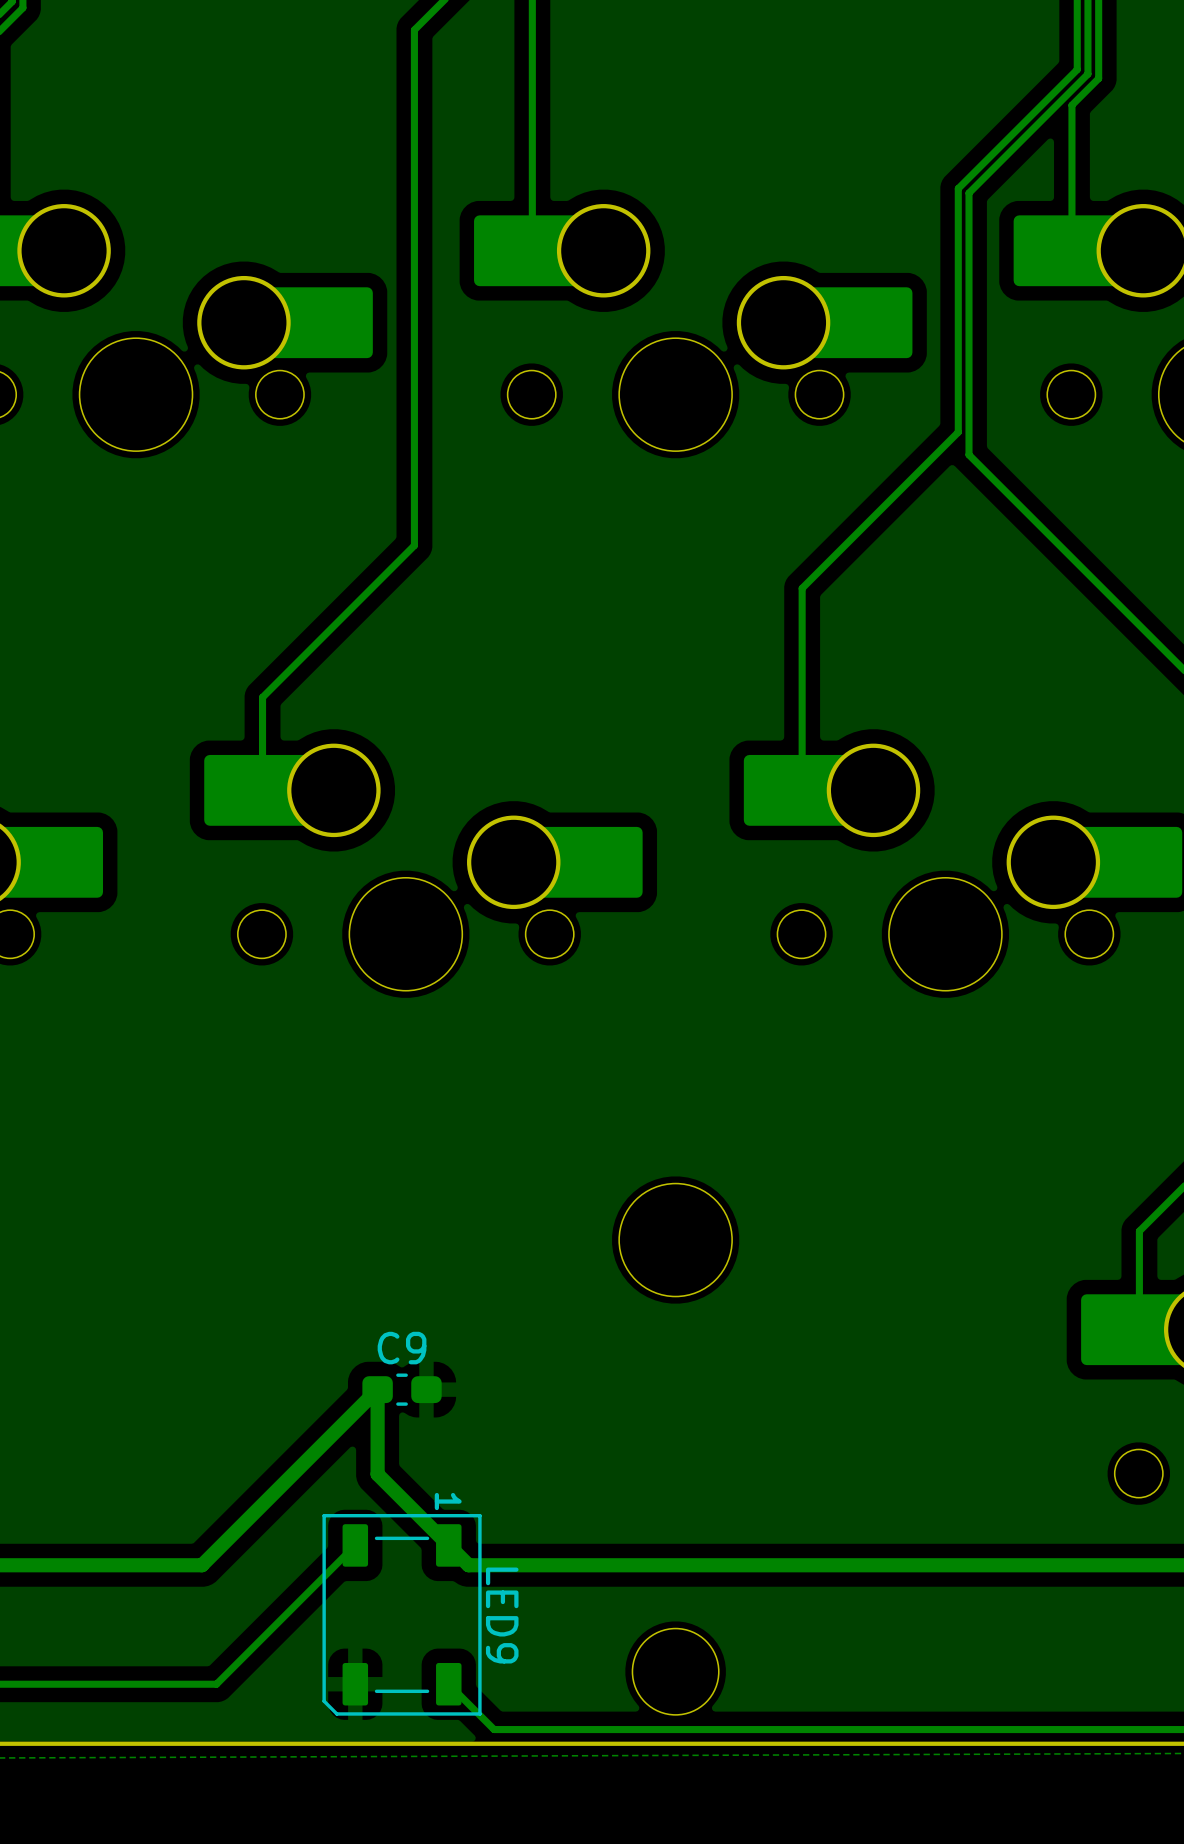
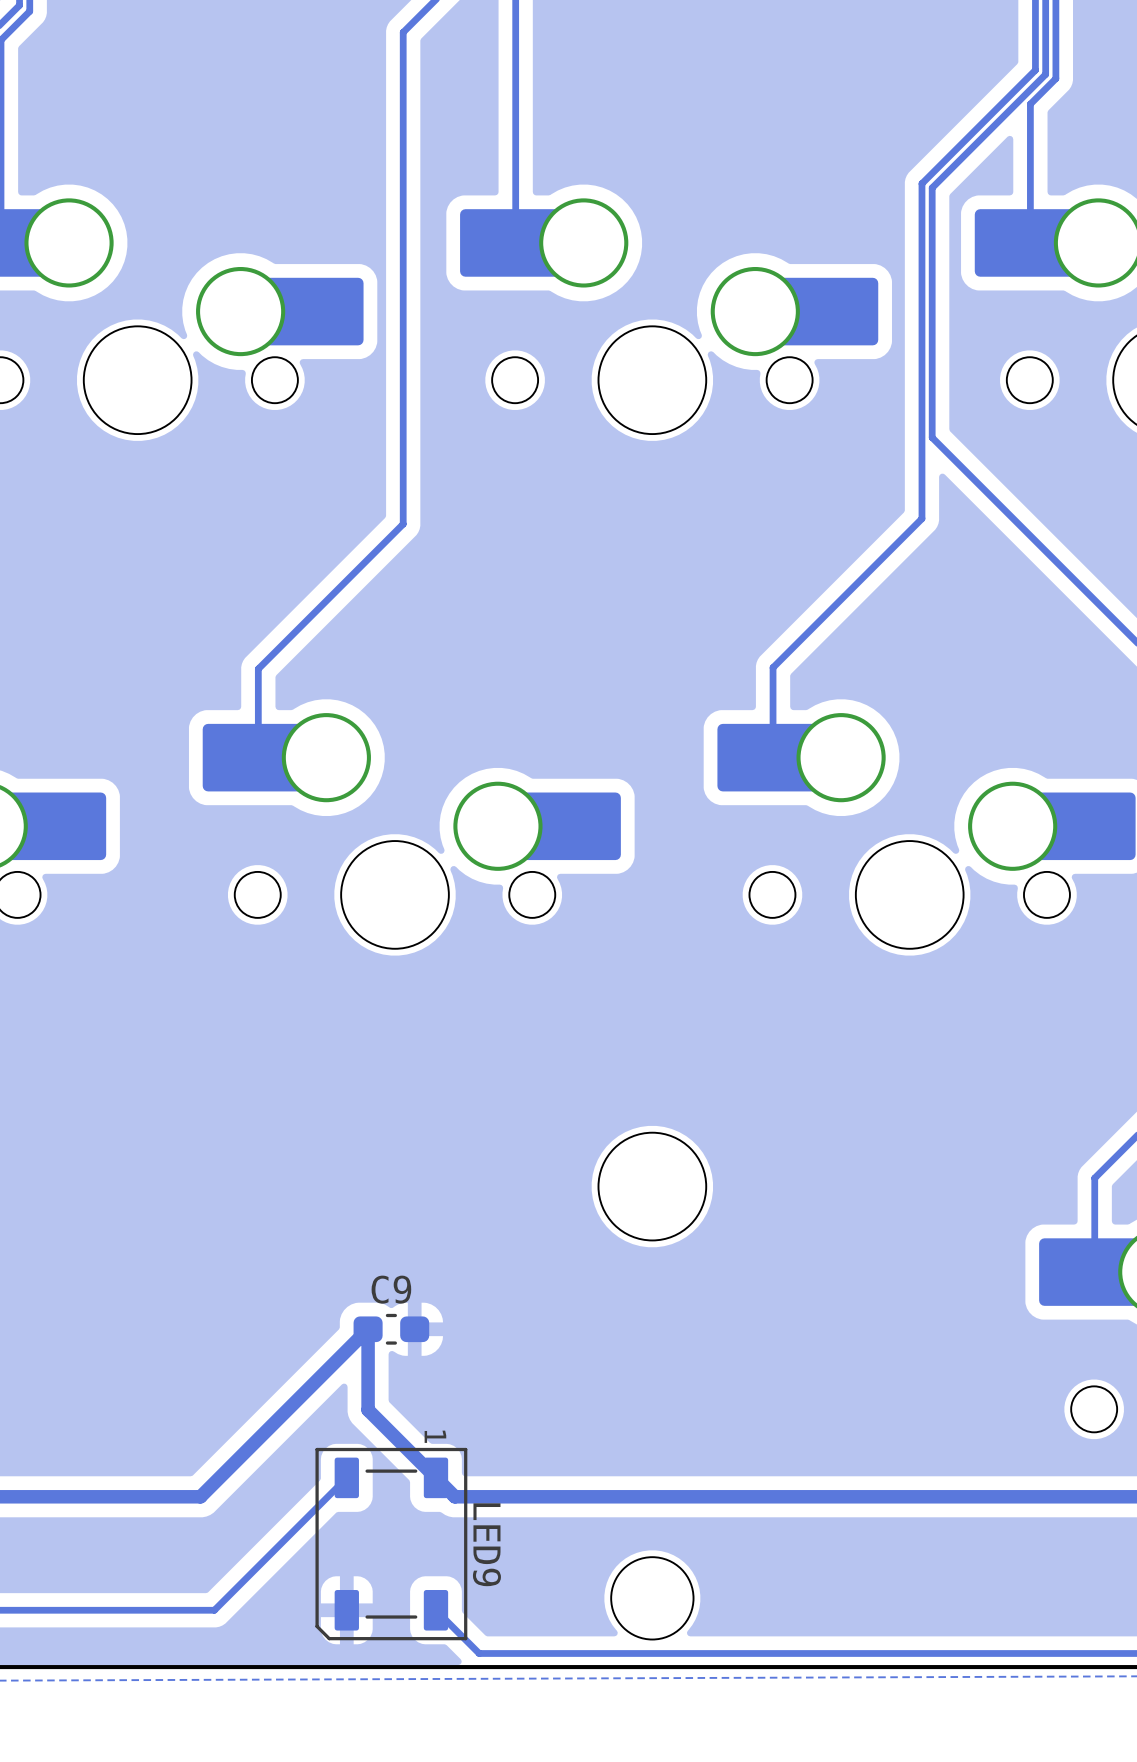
track: (958, 432) (802, 588) (802, 696) -> (921, 416) (921, 518) (773, 667)

